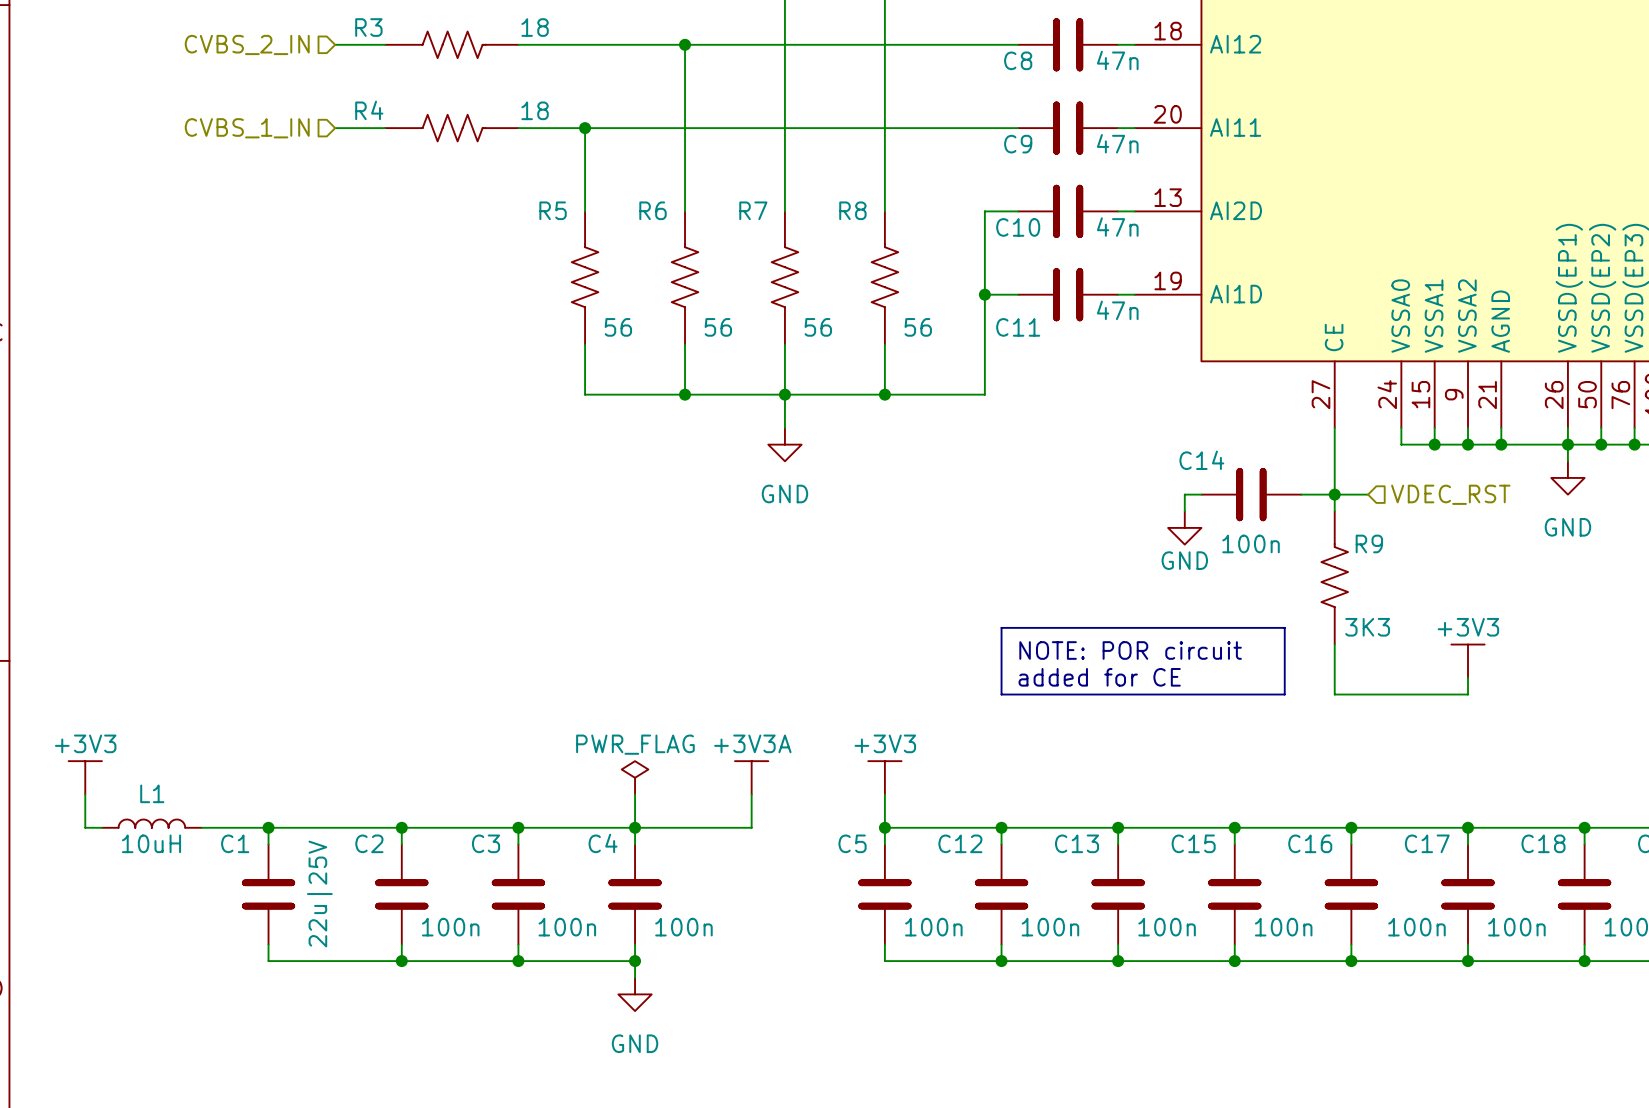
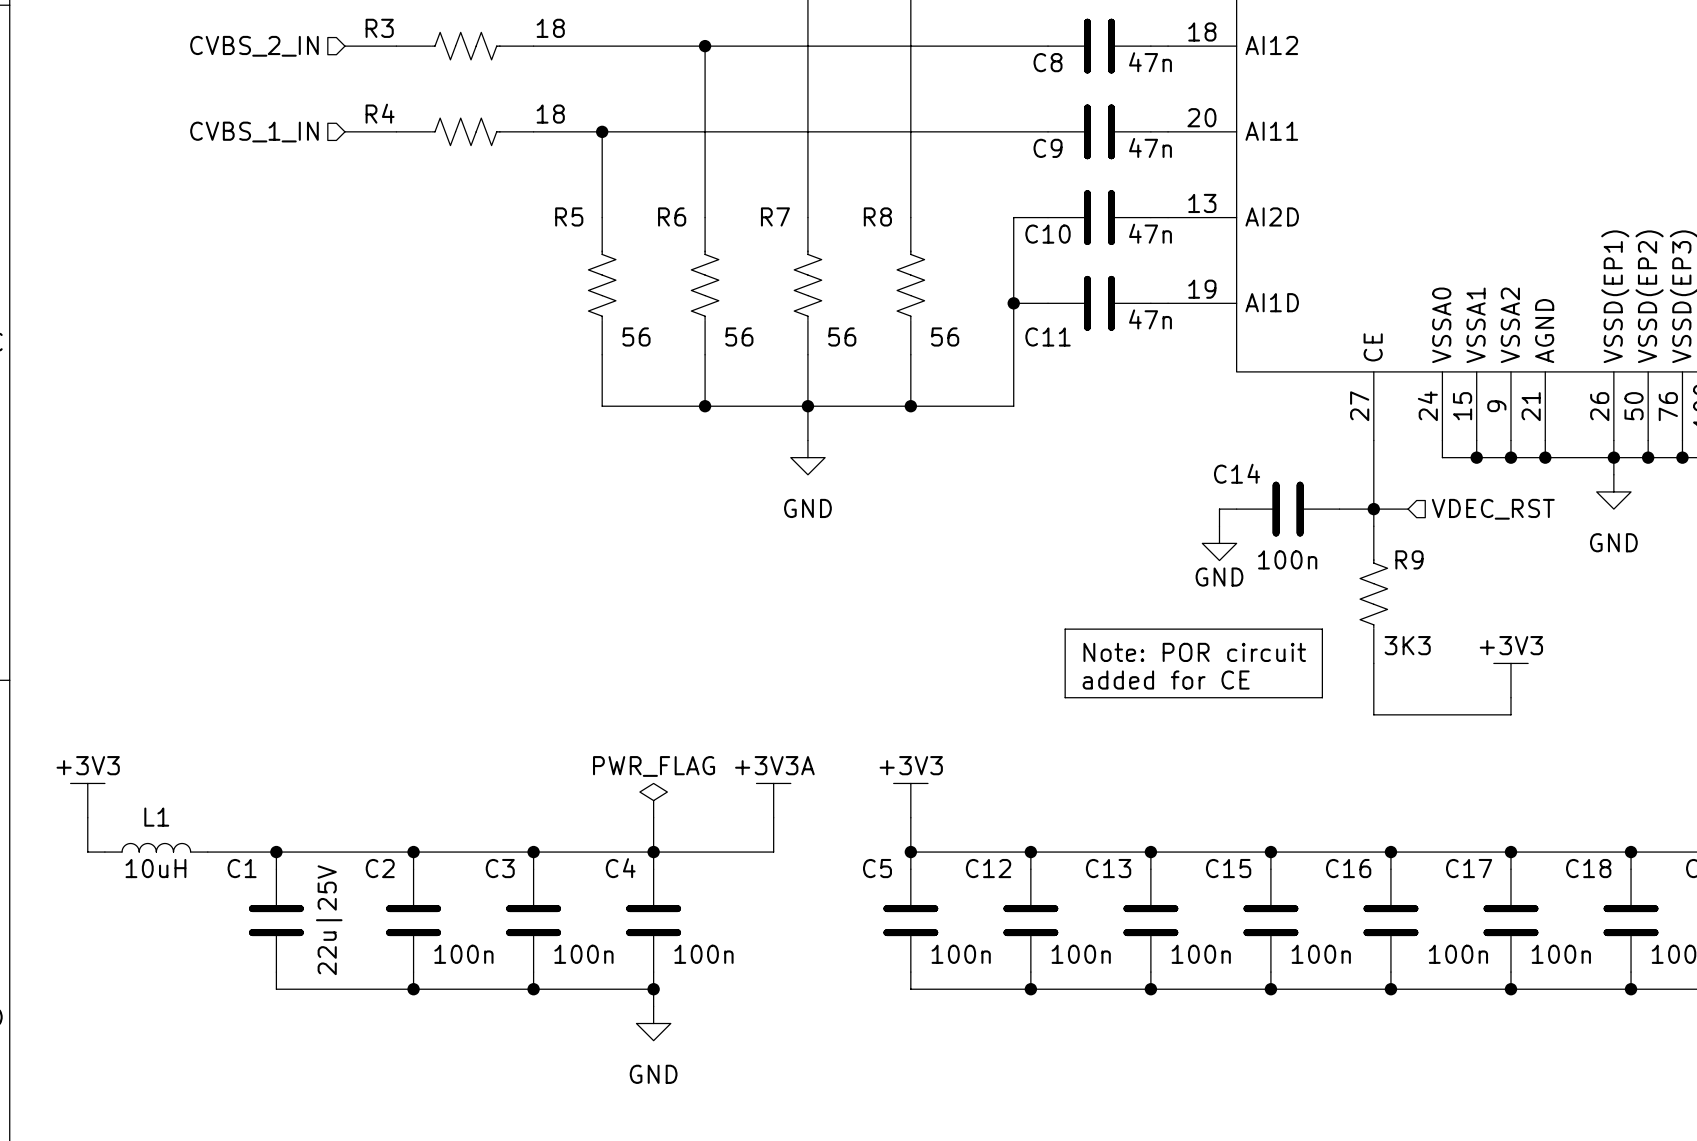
line: (1284, 627) (1001, 627) (1001, 694) (1284, 694) (1284, 677) -> (1322, 646) (1322, 629) (1065, 629) (1065, 697) (1322, 697)
text: NOTE: POR circuit (1130, 650) -> Note: POR circuit (1194, 652)
text position: added for CE (1099, 677) -> added for CE (1166, 680)

